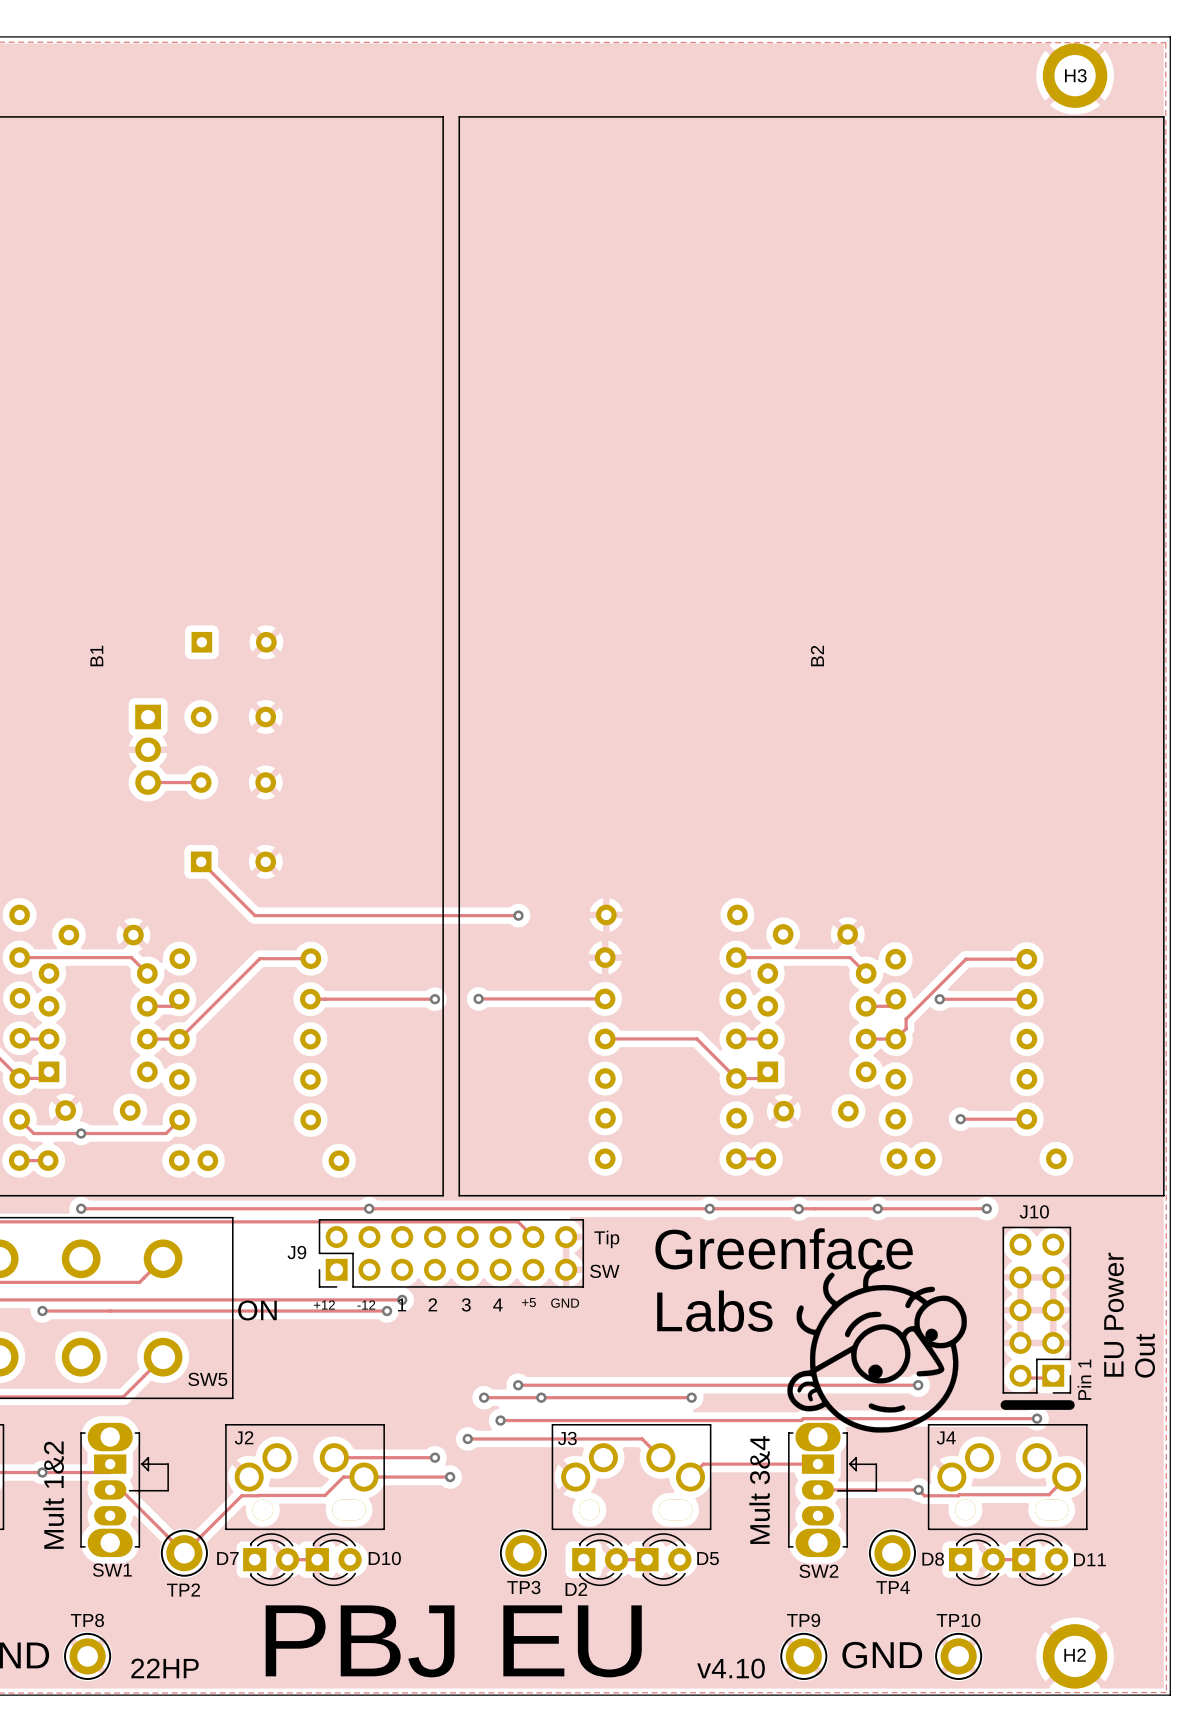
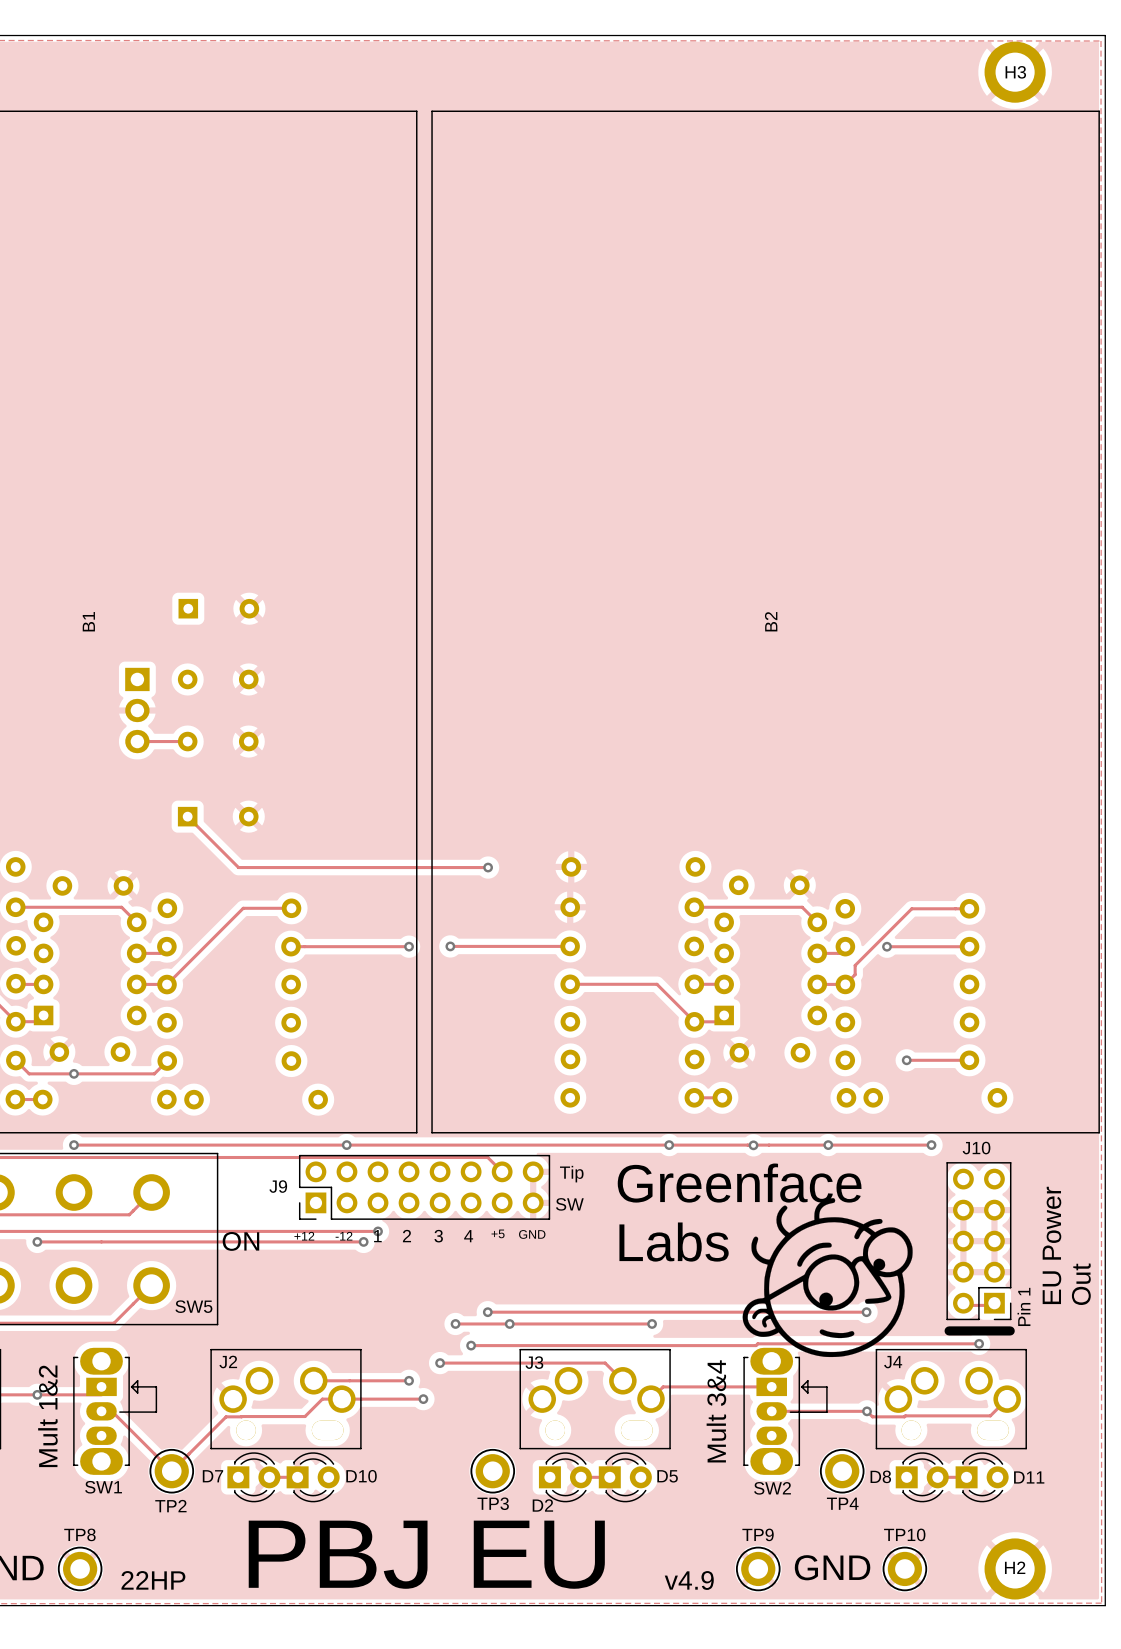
text: v4.10 (731, 1668) -> v4.9 (689, 1580)

